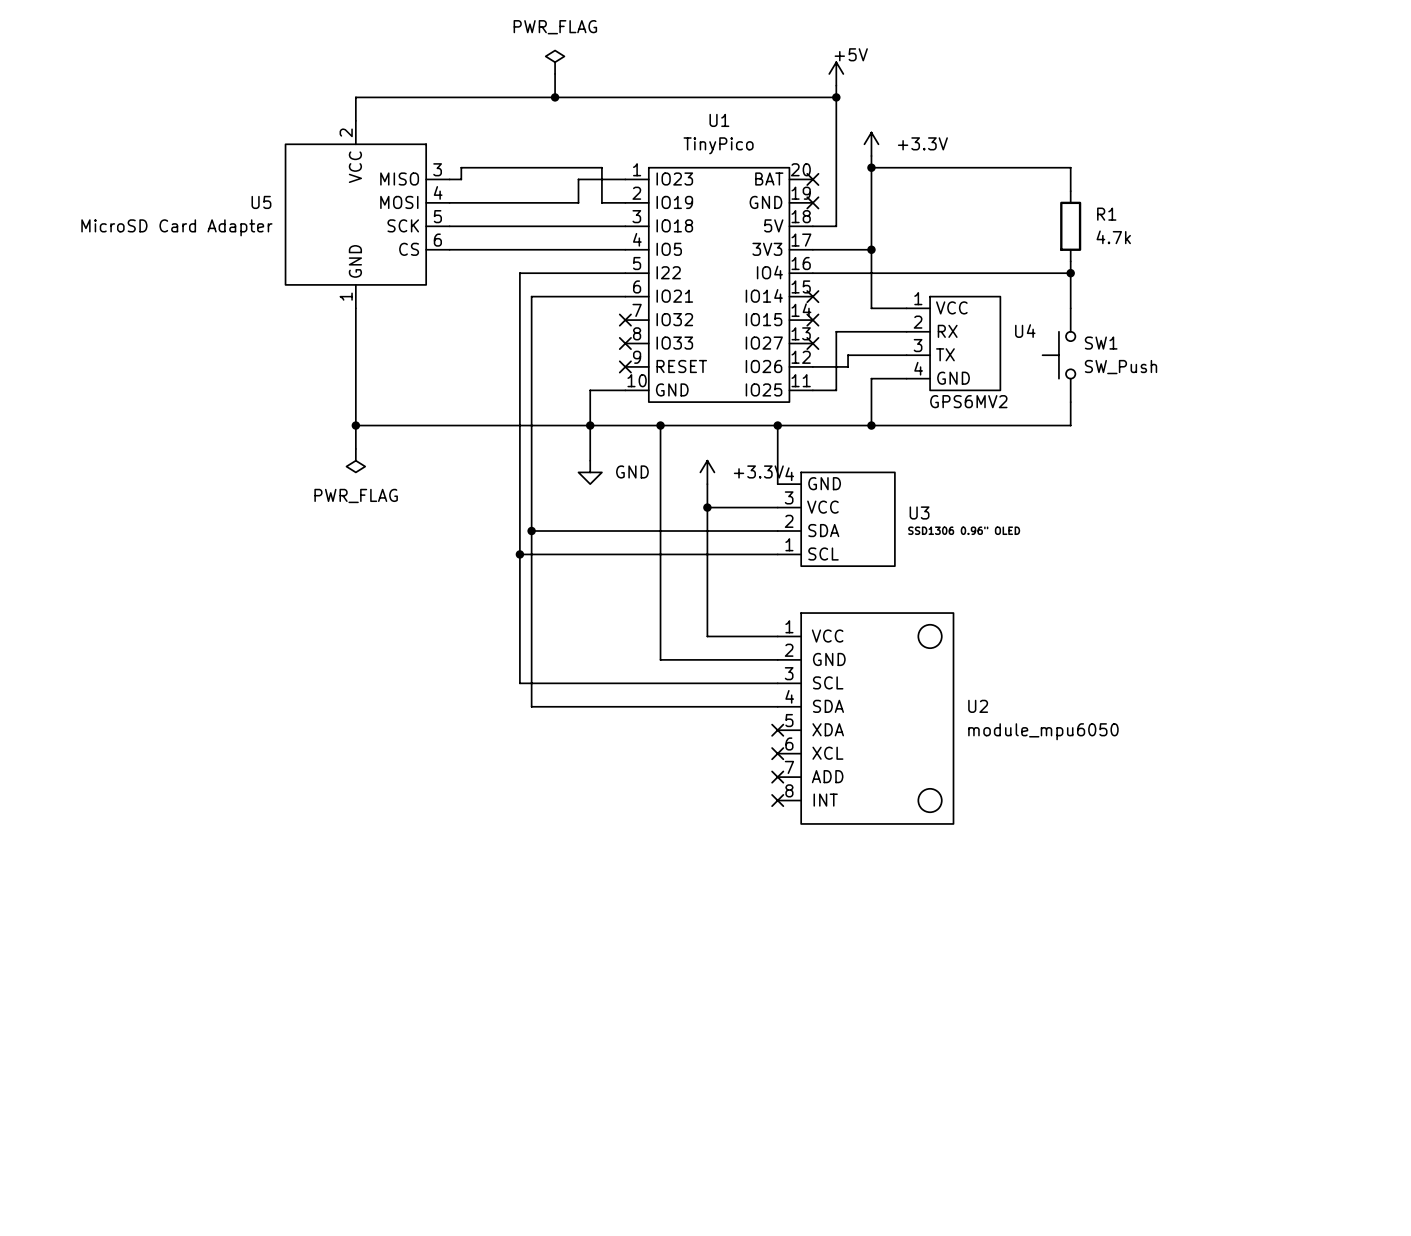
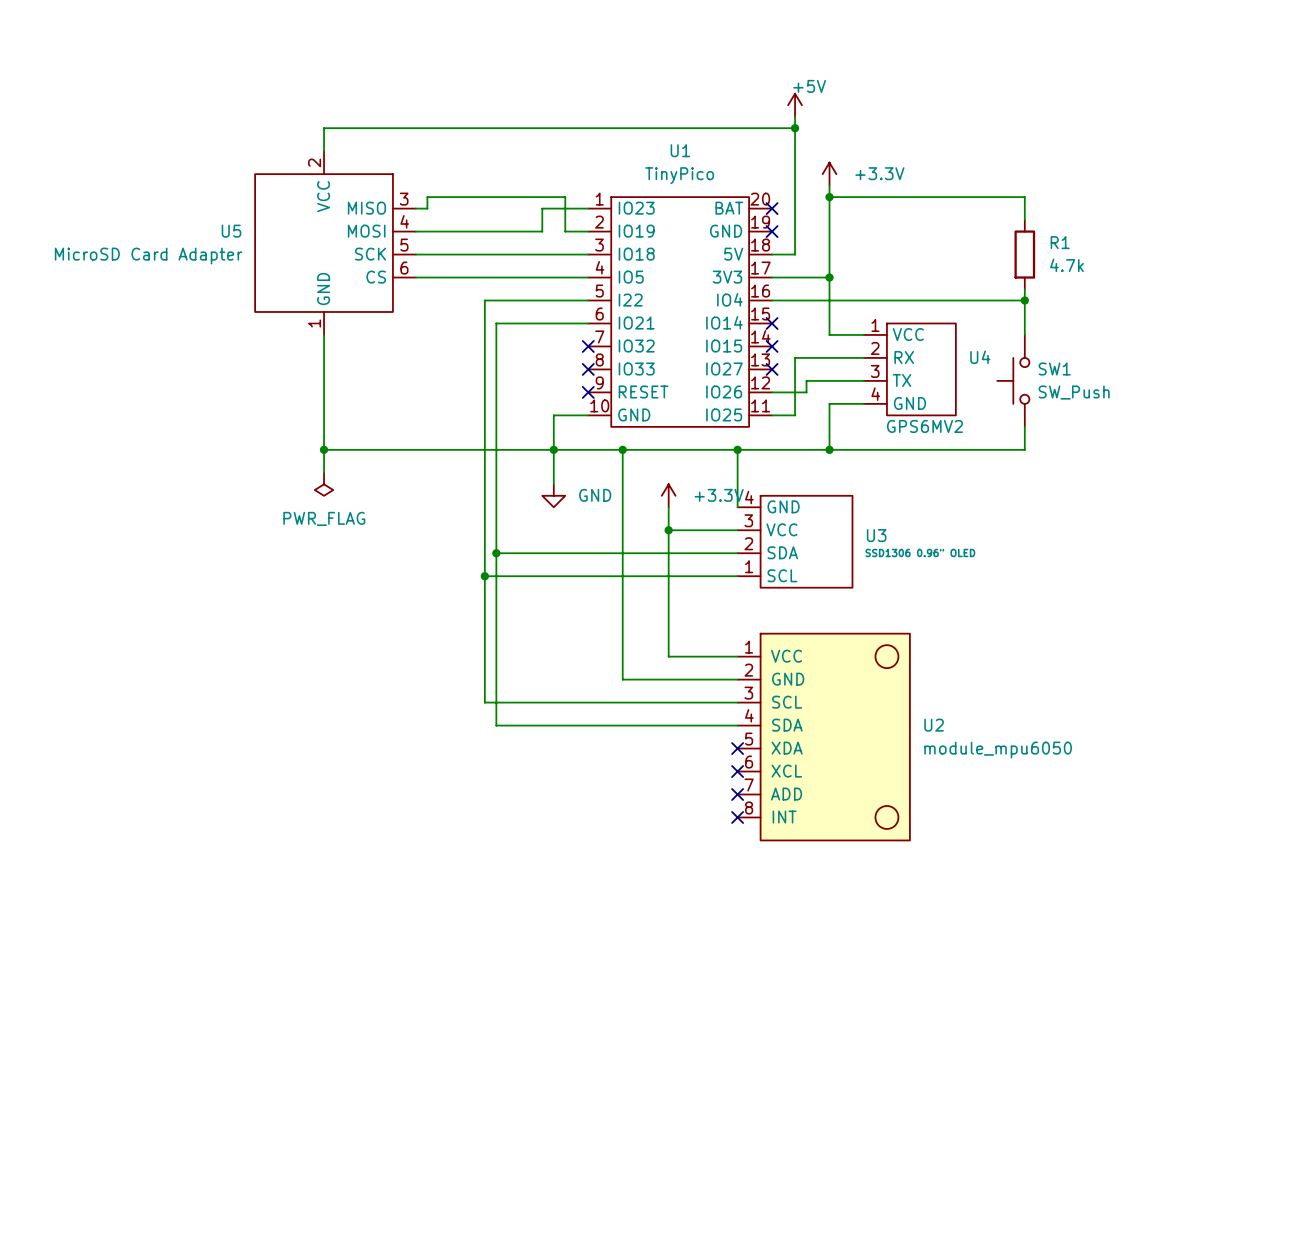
power symbol: PWR_FLAG (555, 62) -> none
wire: (555, 73) (555, 97) -> none
junction: (555, 97) -> none

